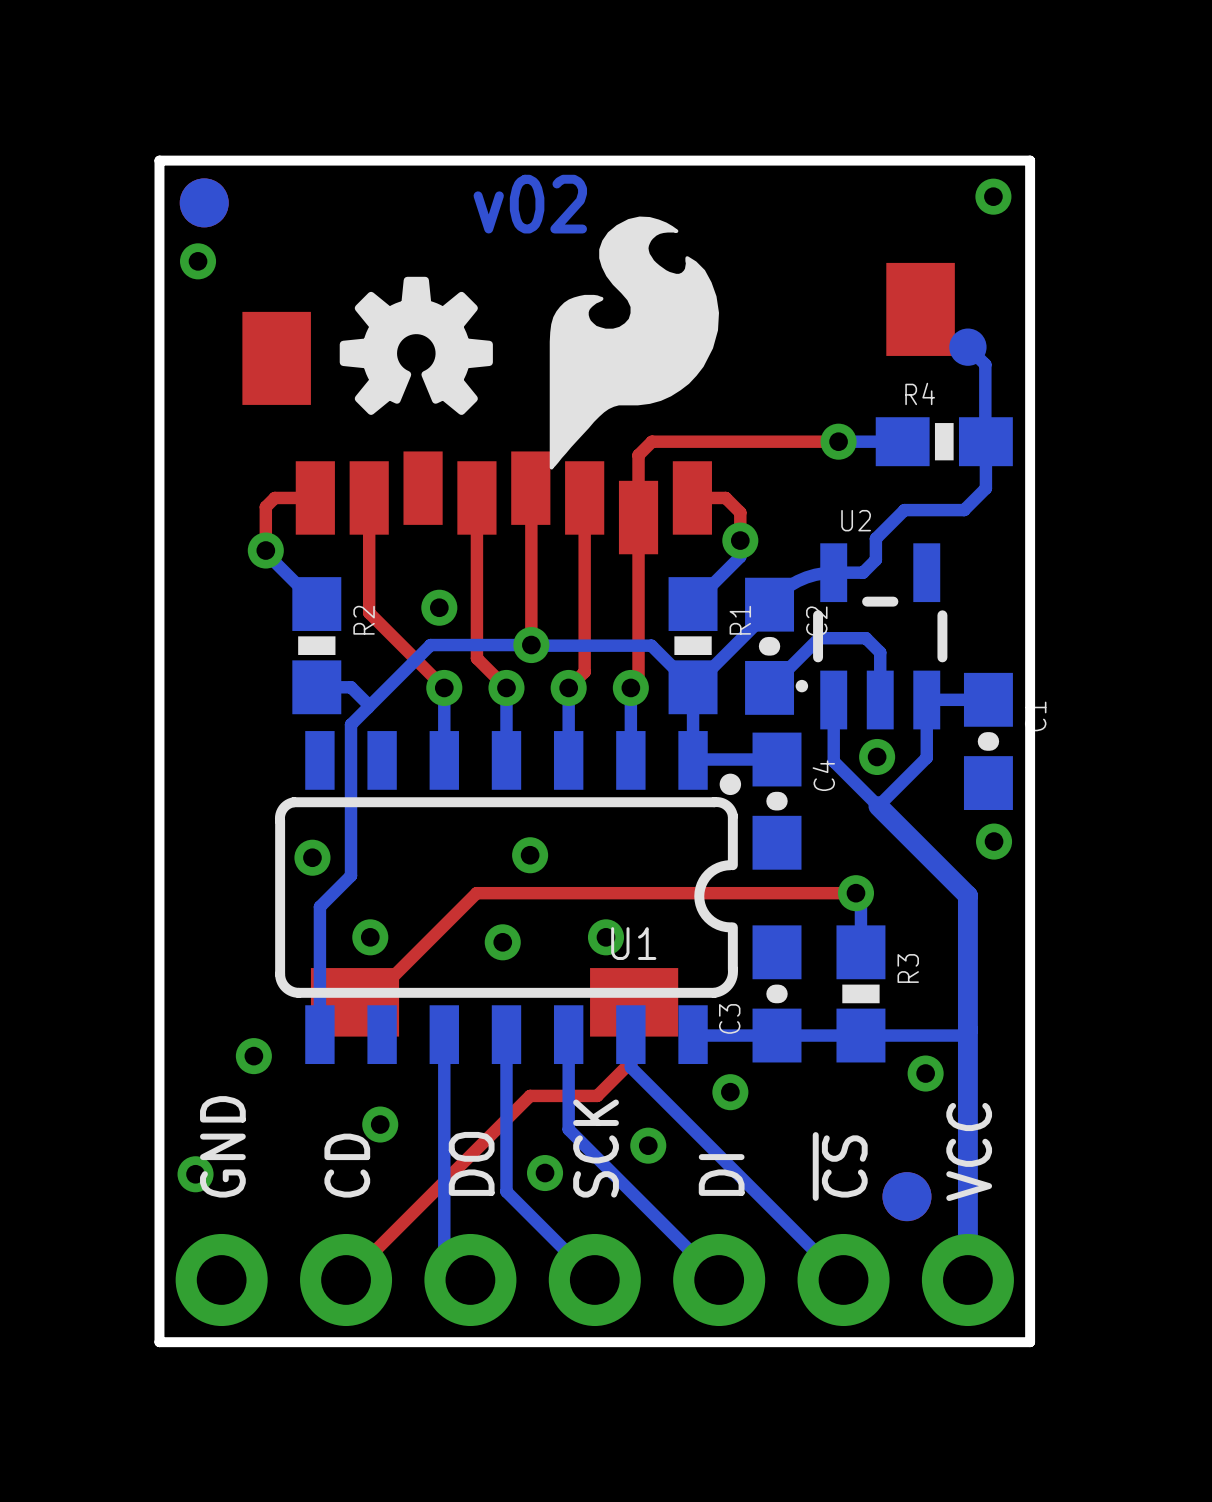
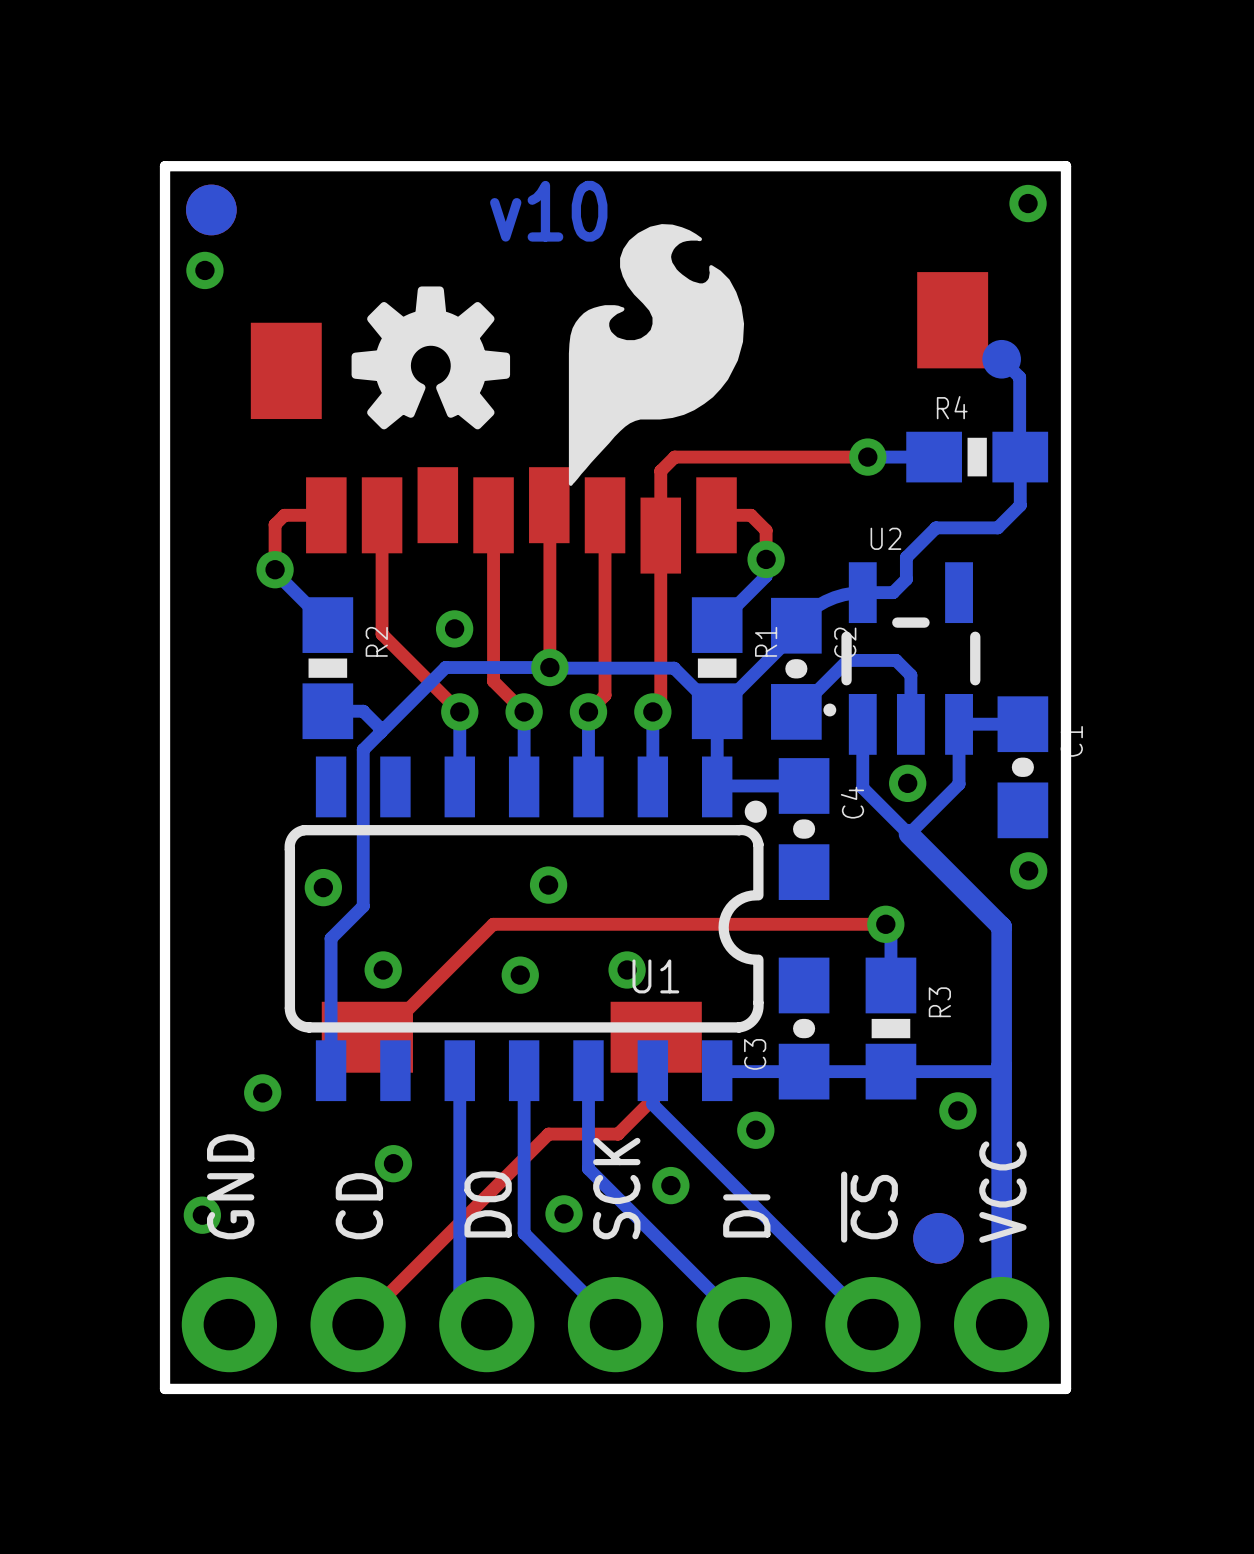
text: v02 (530, 204) -> v10 (548, 211)

